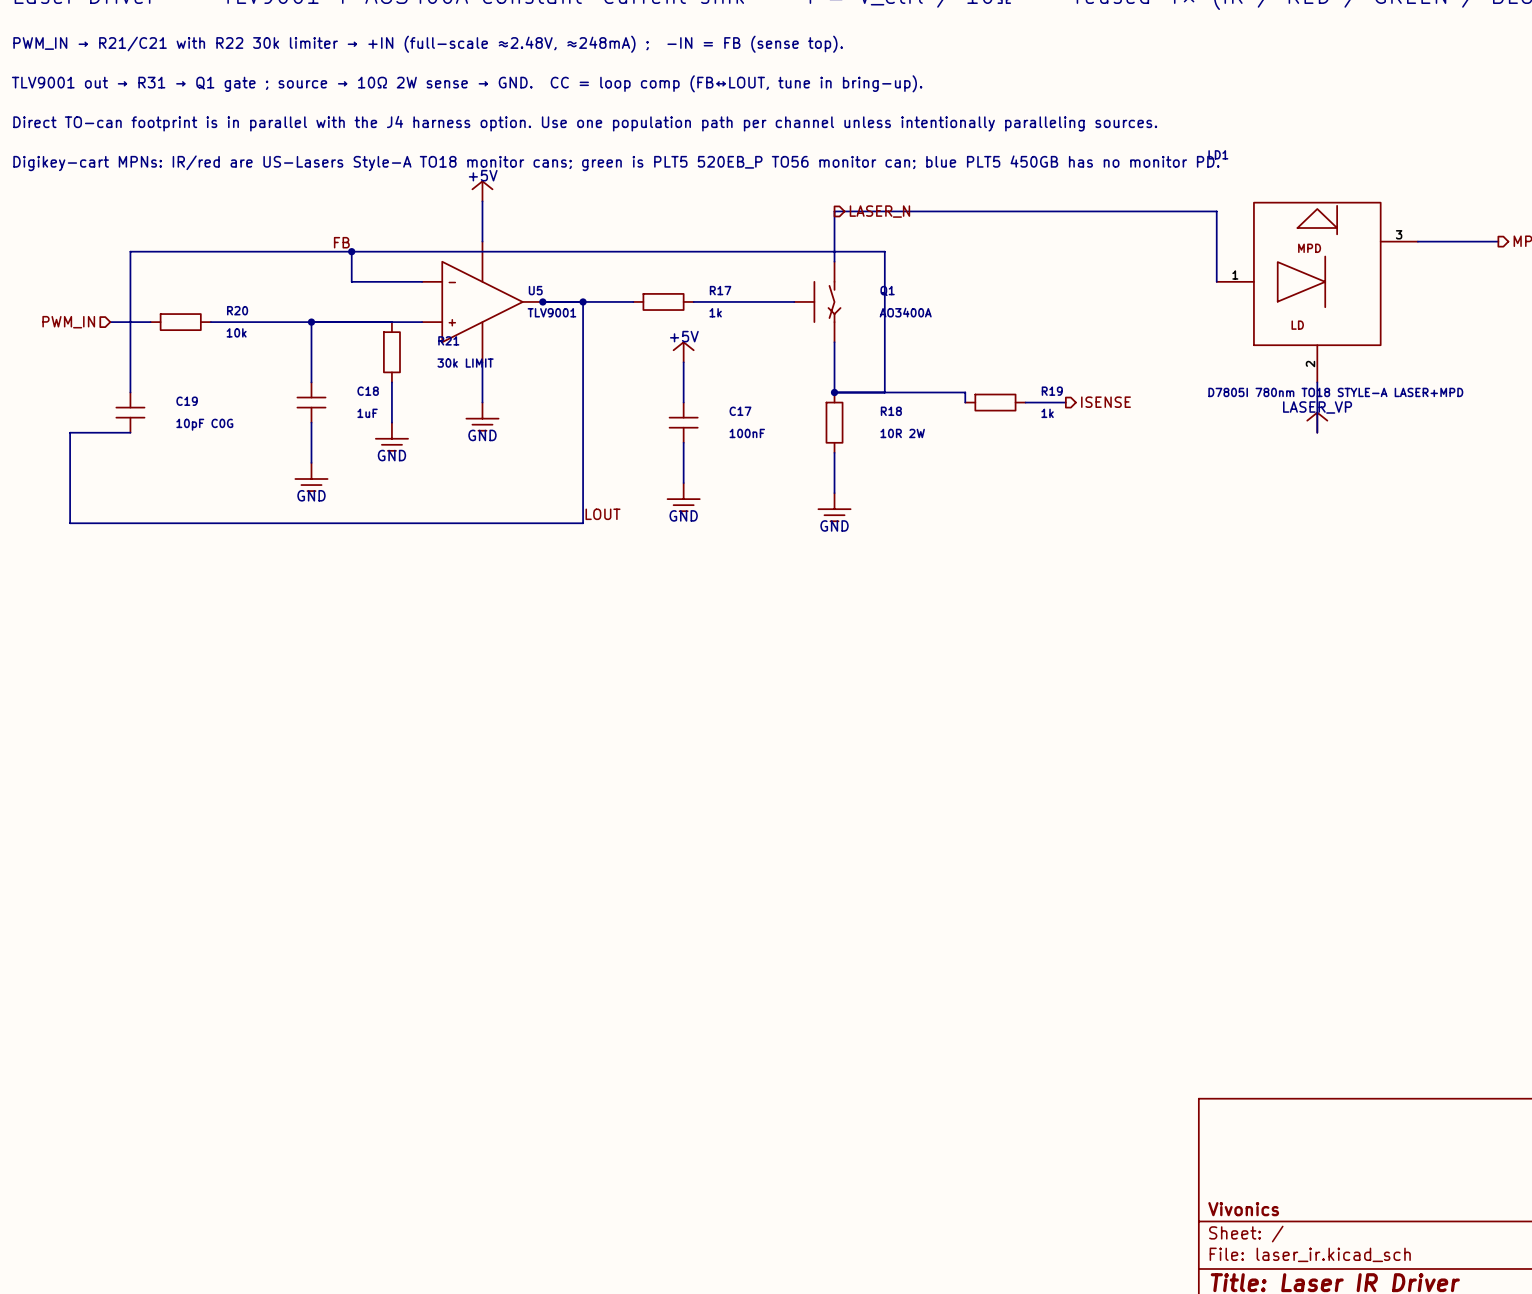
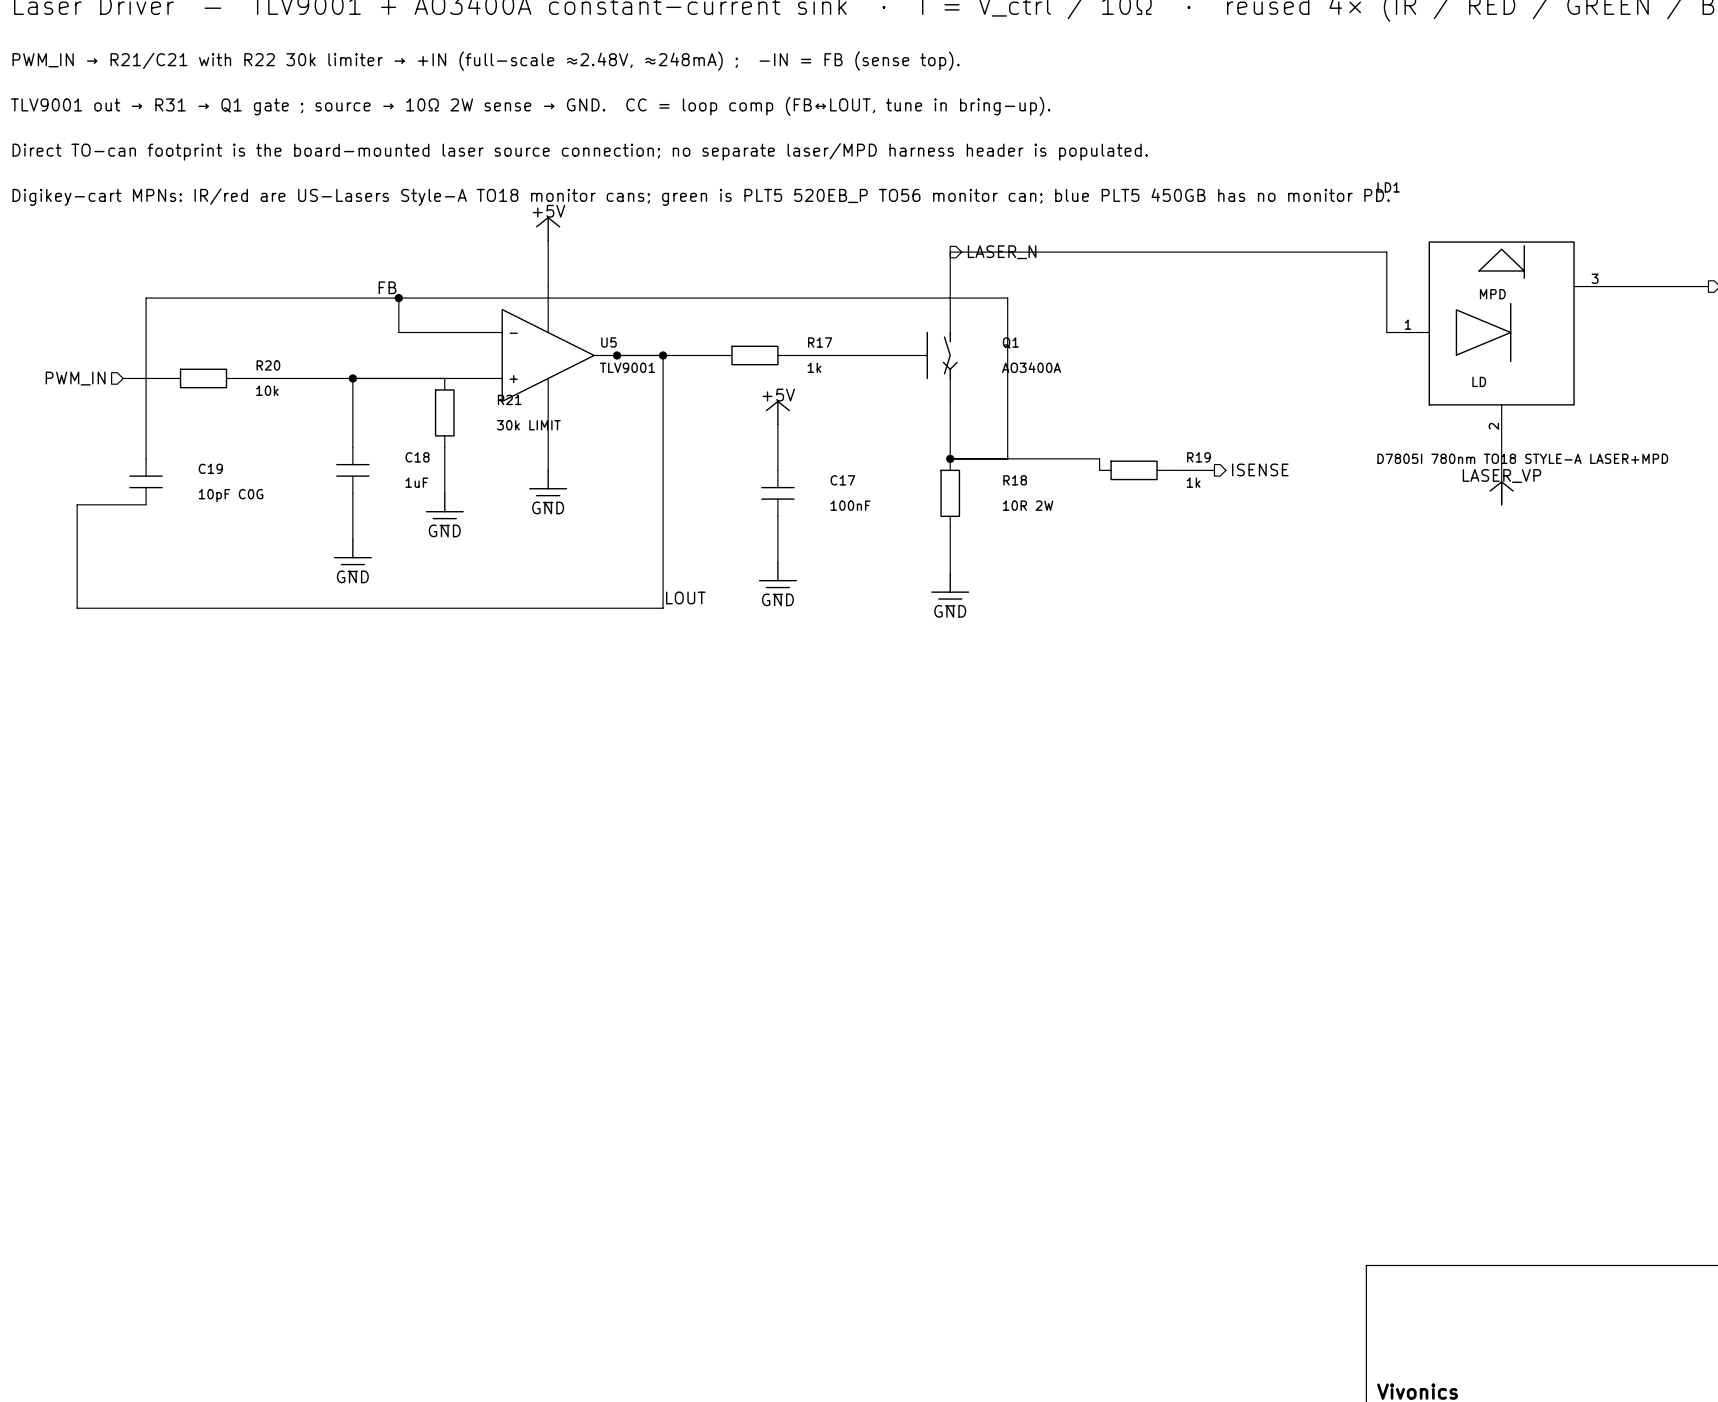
text: Direct TO-can footprint is in parallel with the J4 harness option. Use one population path per channel unless intentionally paralleling sources. (585, 123) -> Direct TO-can footprint is the board-mounted laser source connection; no separate laser/MPD harness header is populated. (580, 151)

